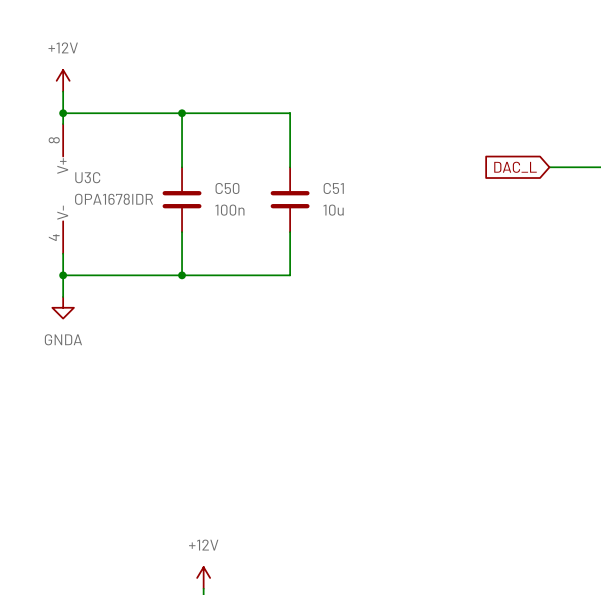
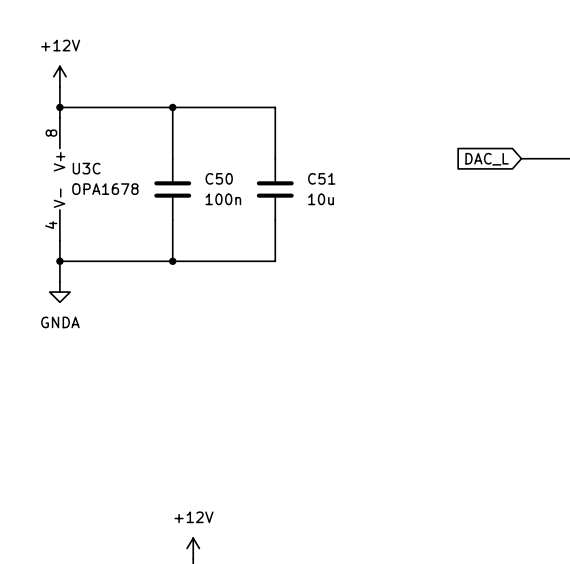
U3C value: OPA1678IDR (114, 199) -> OPA1678 (105, 189)

